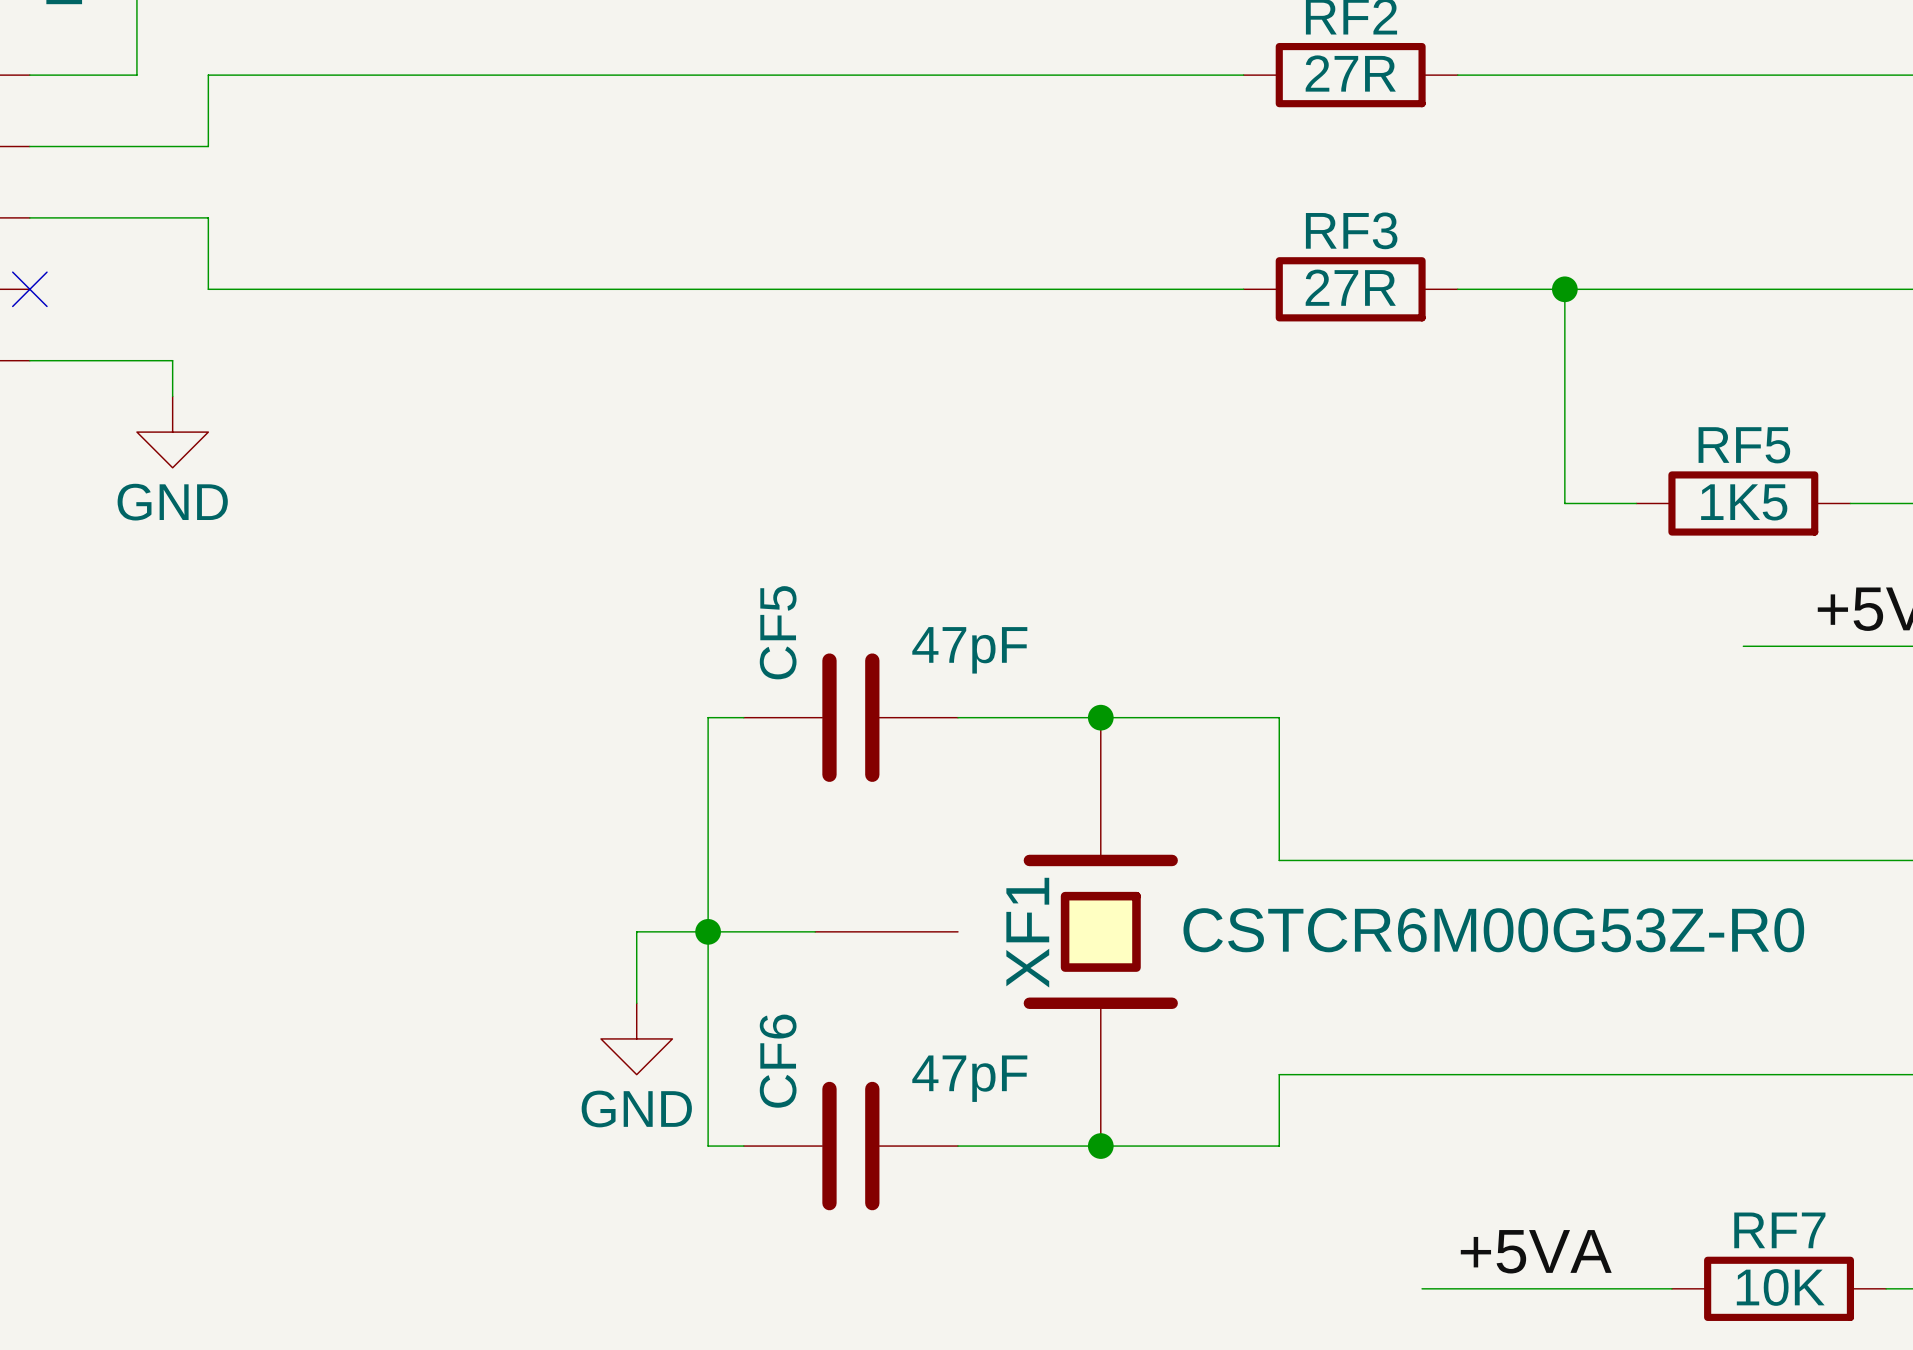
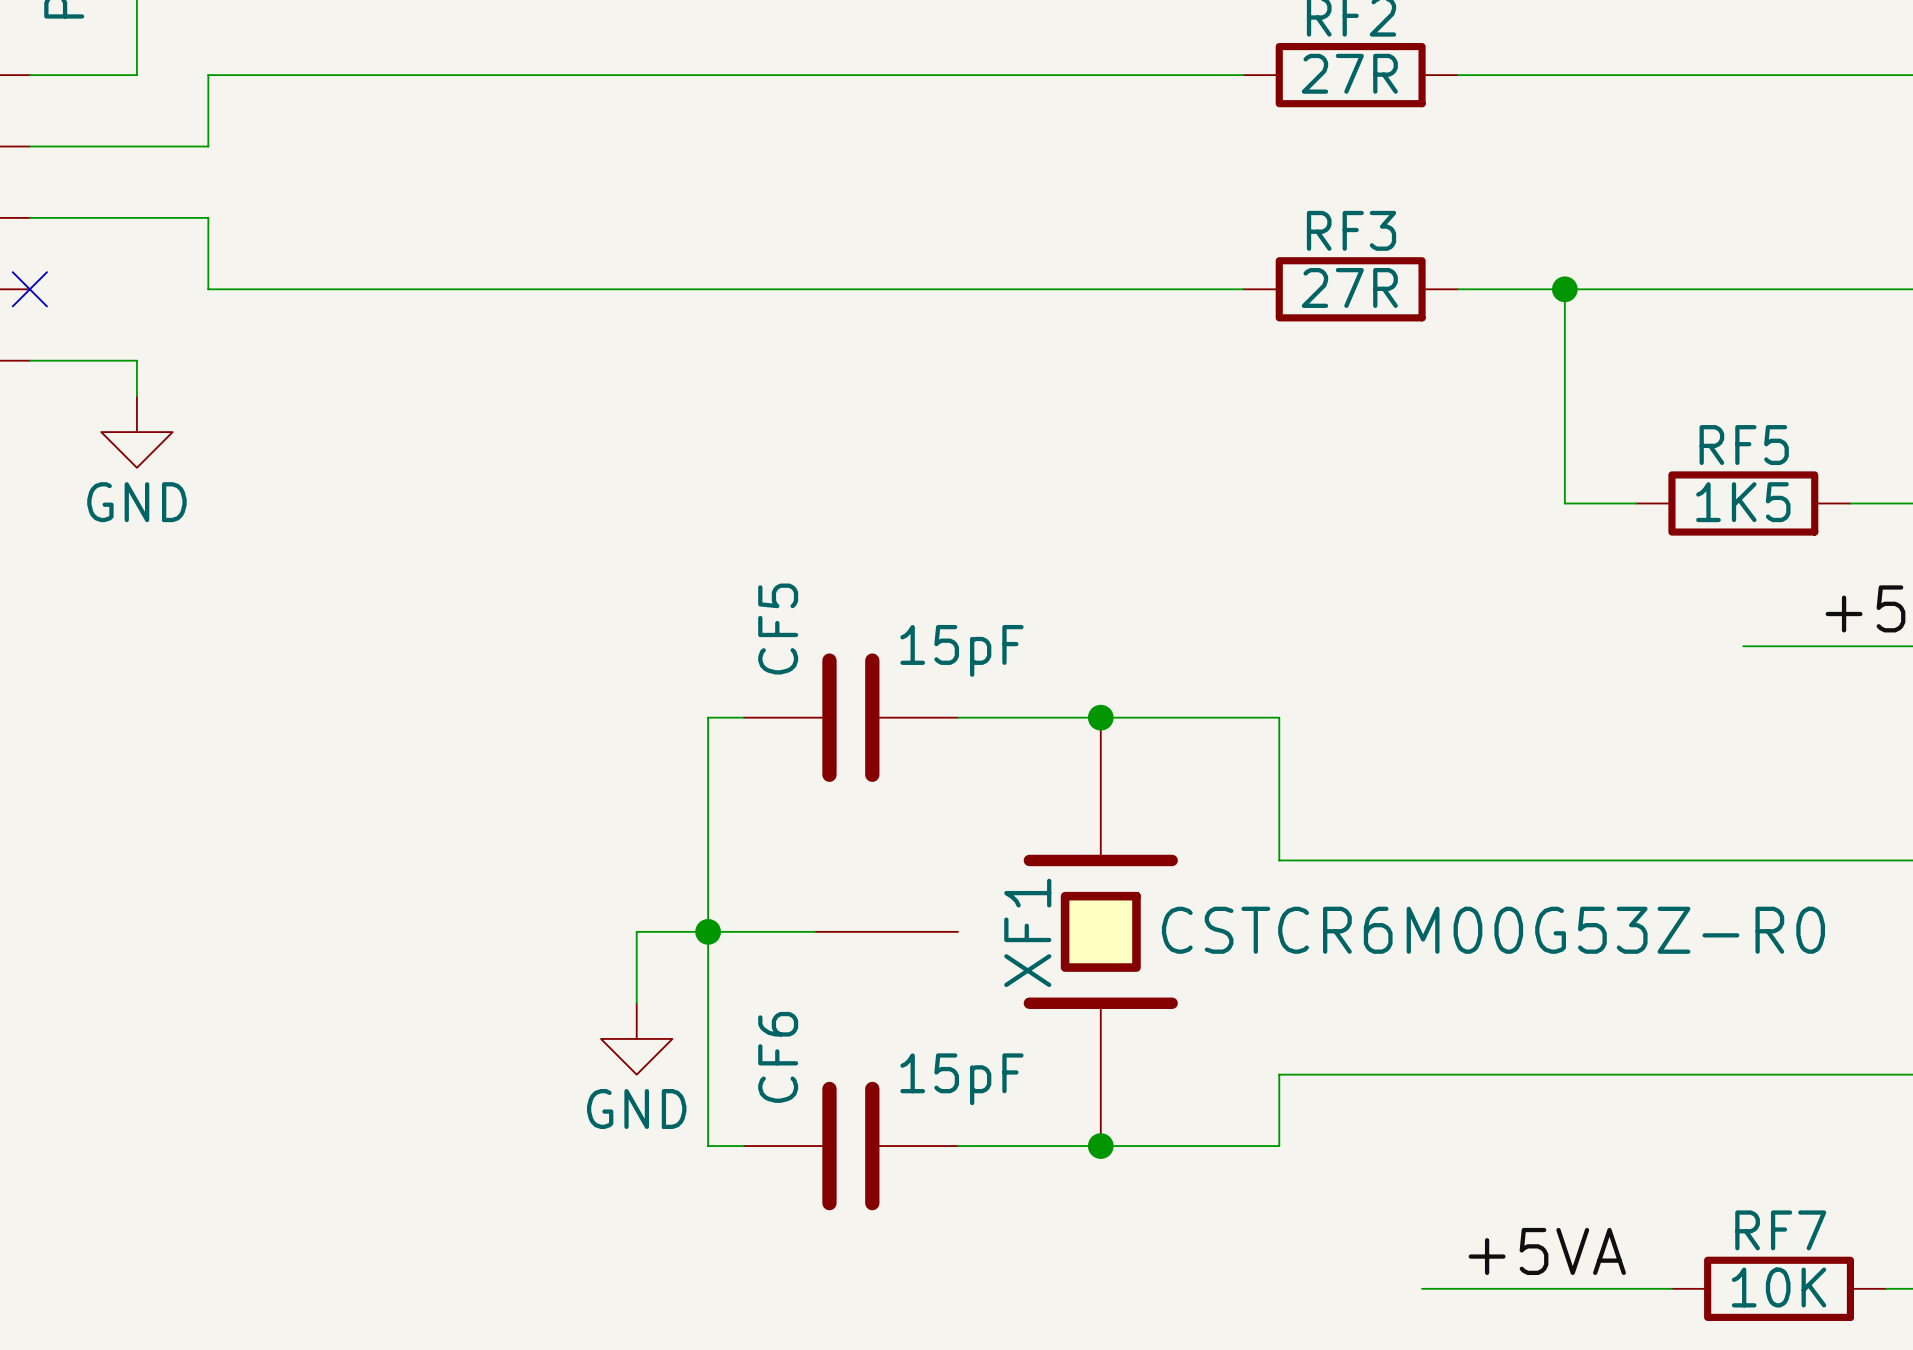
wire: (136, 360) (172, 360) (172, 396) -> (136, 360) (136, 396)
power symbol position: GND (172, 432) -> GND (136, 432)
CF5 value: 47pF (969, 650) -> 15pF (961, 650)
CF6 value: 47pF (969, 1078) -> 15pF (961, 1079)

